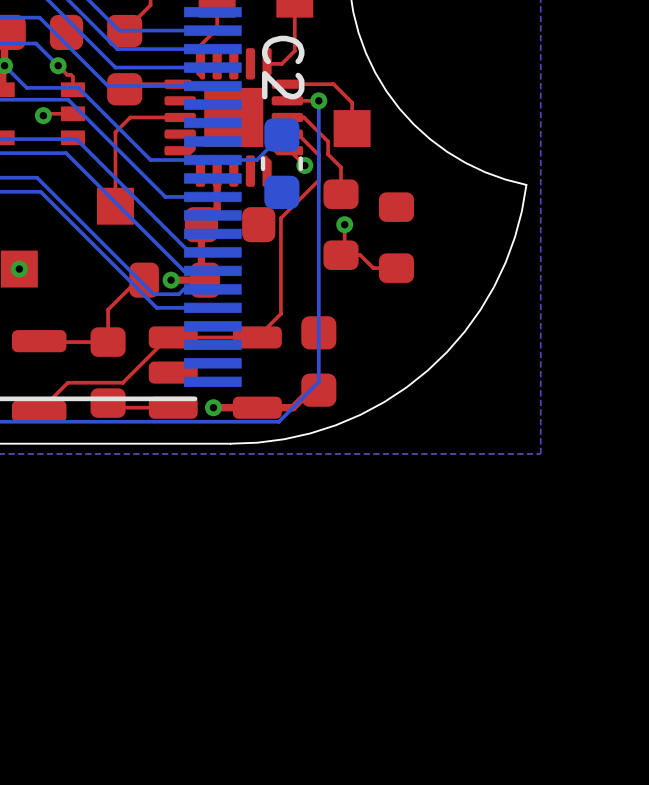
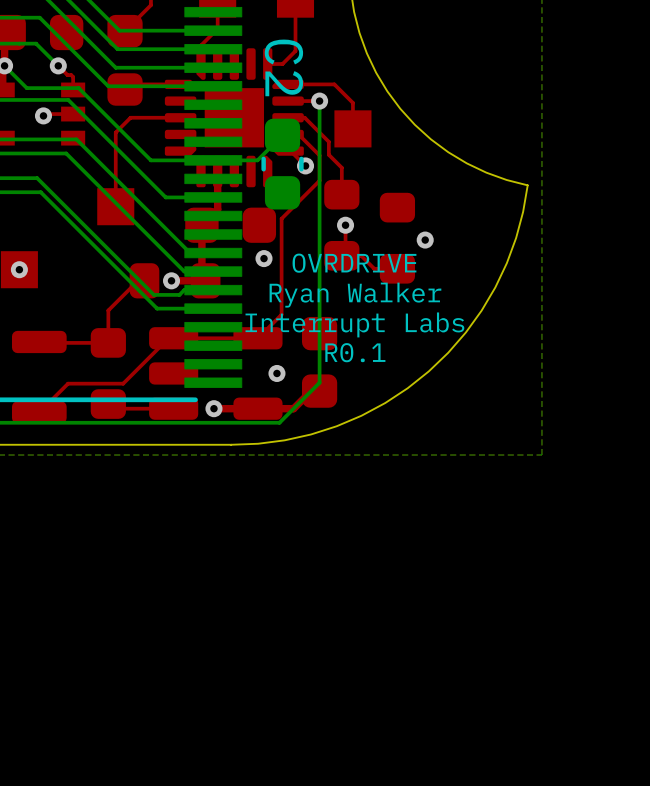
via: none -> (425, 240)
via: none -> (264, 258)
text: none -> OVRDRIVE (354, 263)
text: none -> Ryan Walker (355, 295)
text: none -> Interrupt Labs (354, 324)
text: none -> R0.1 (355, 352)
via: none -> (276, 373)

